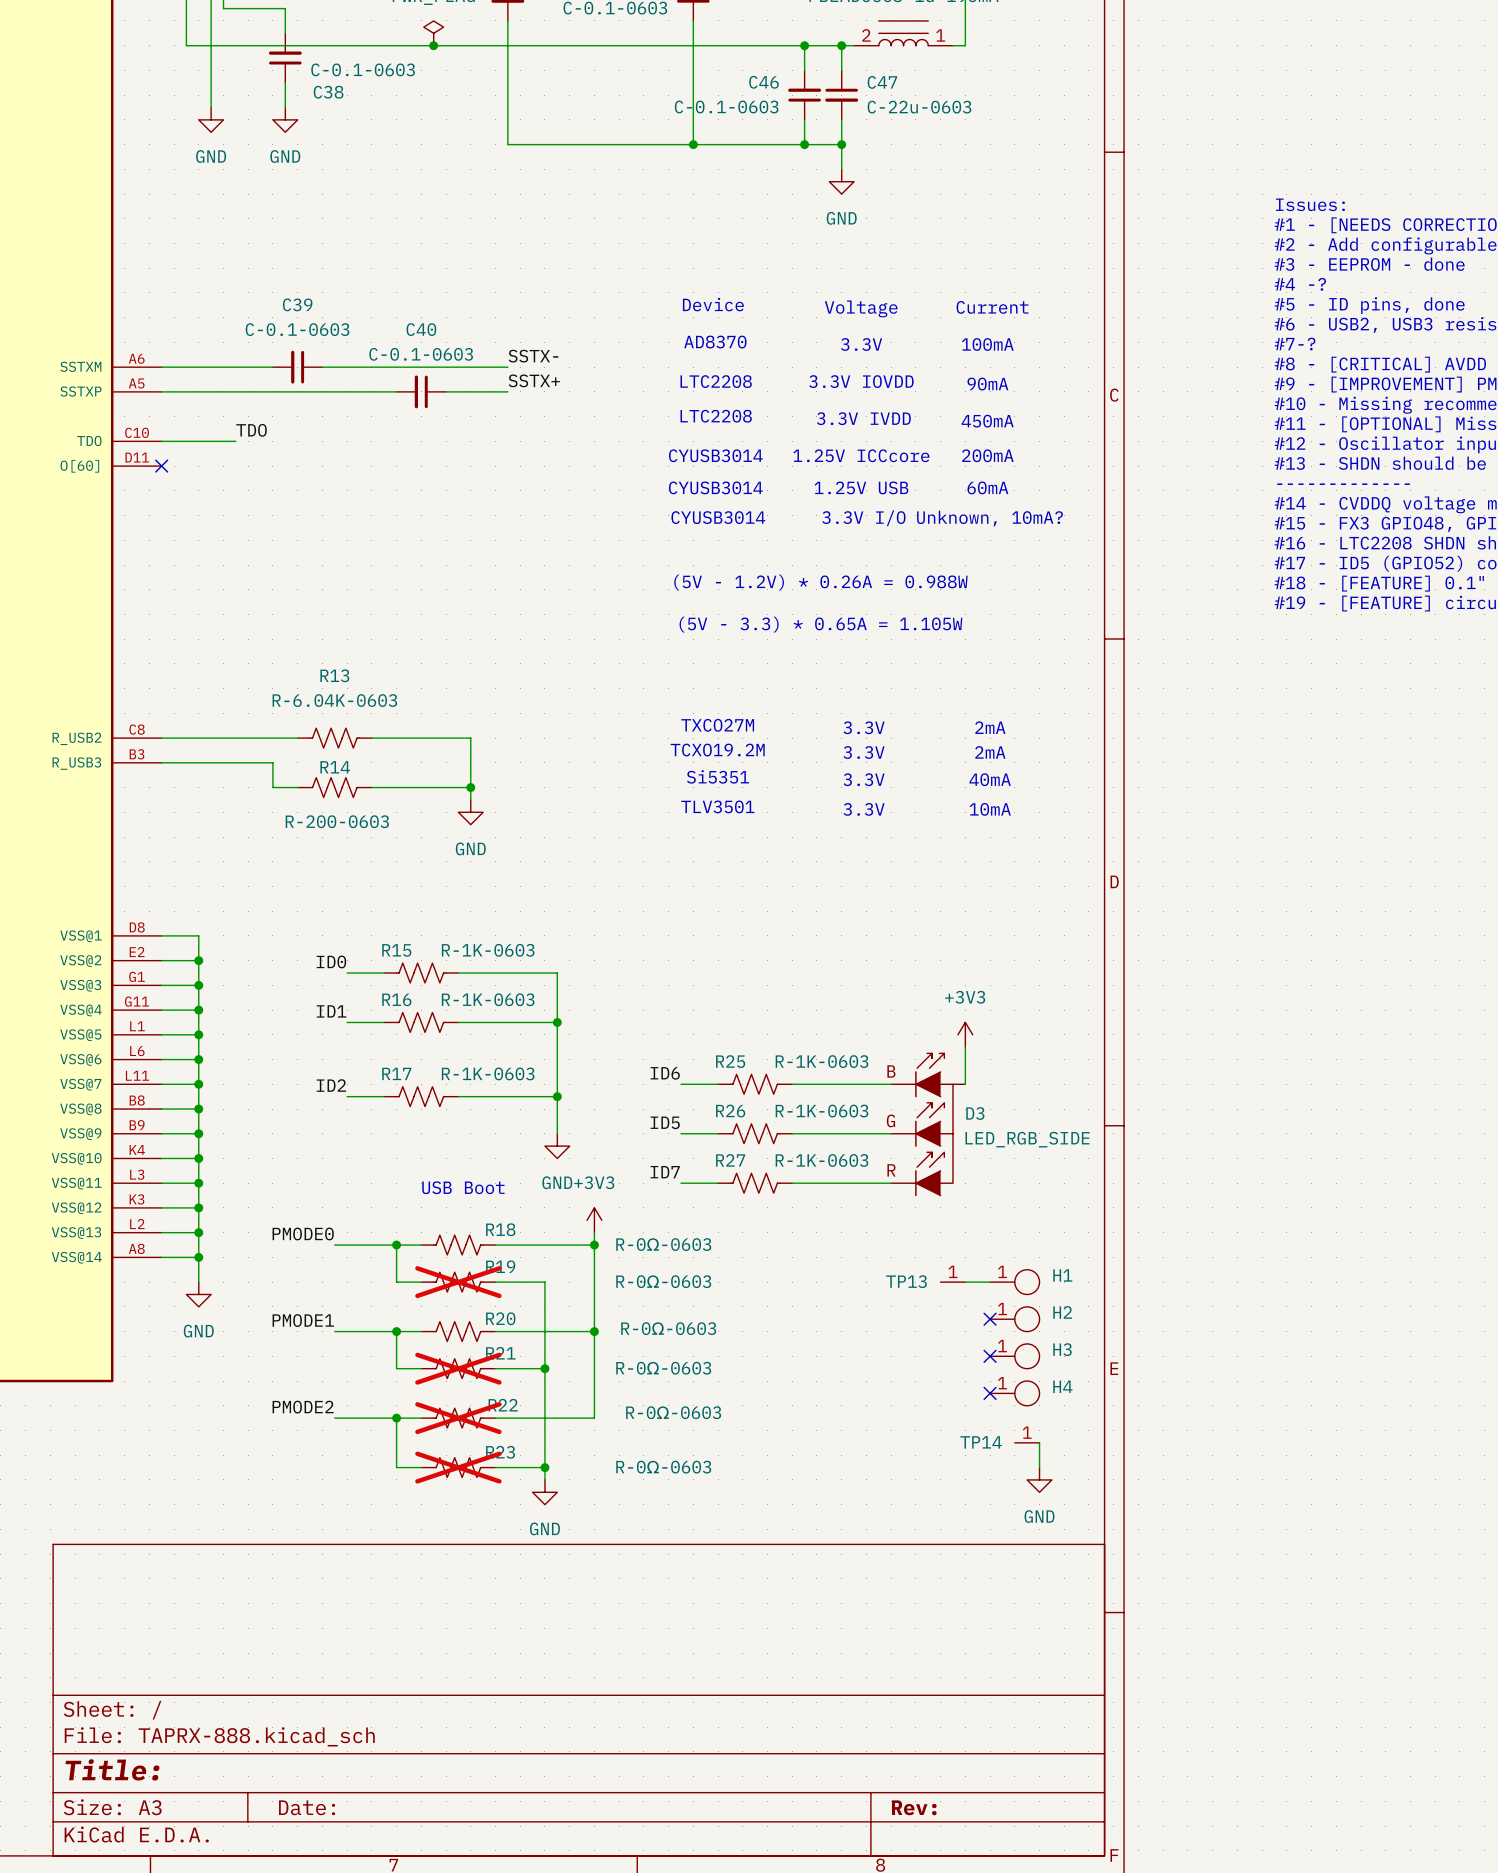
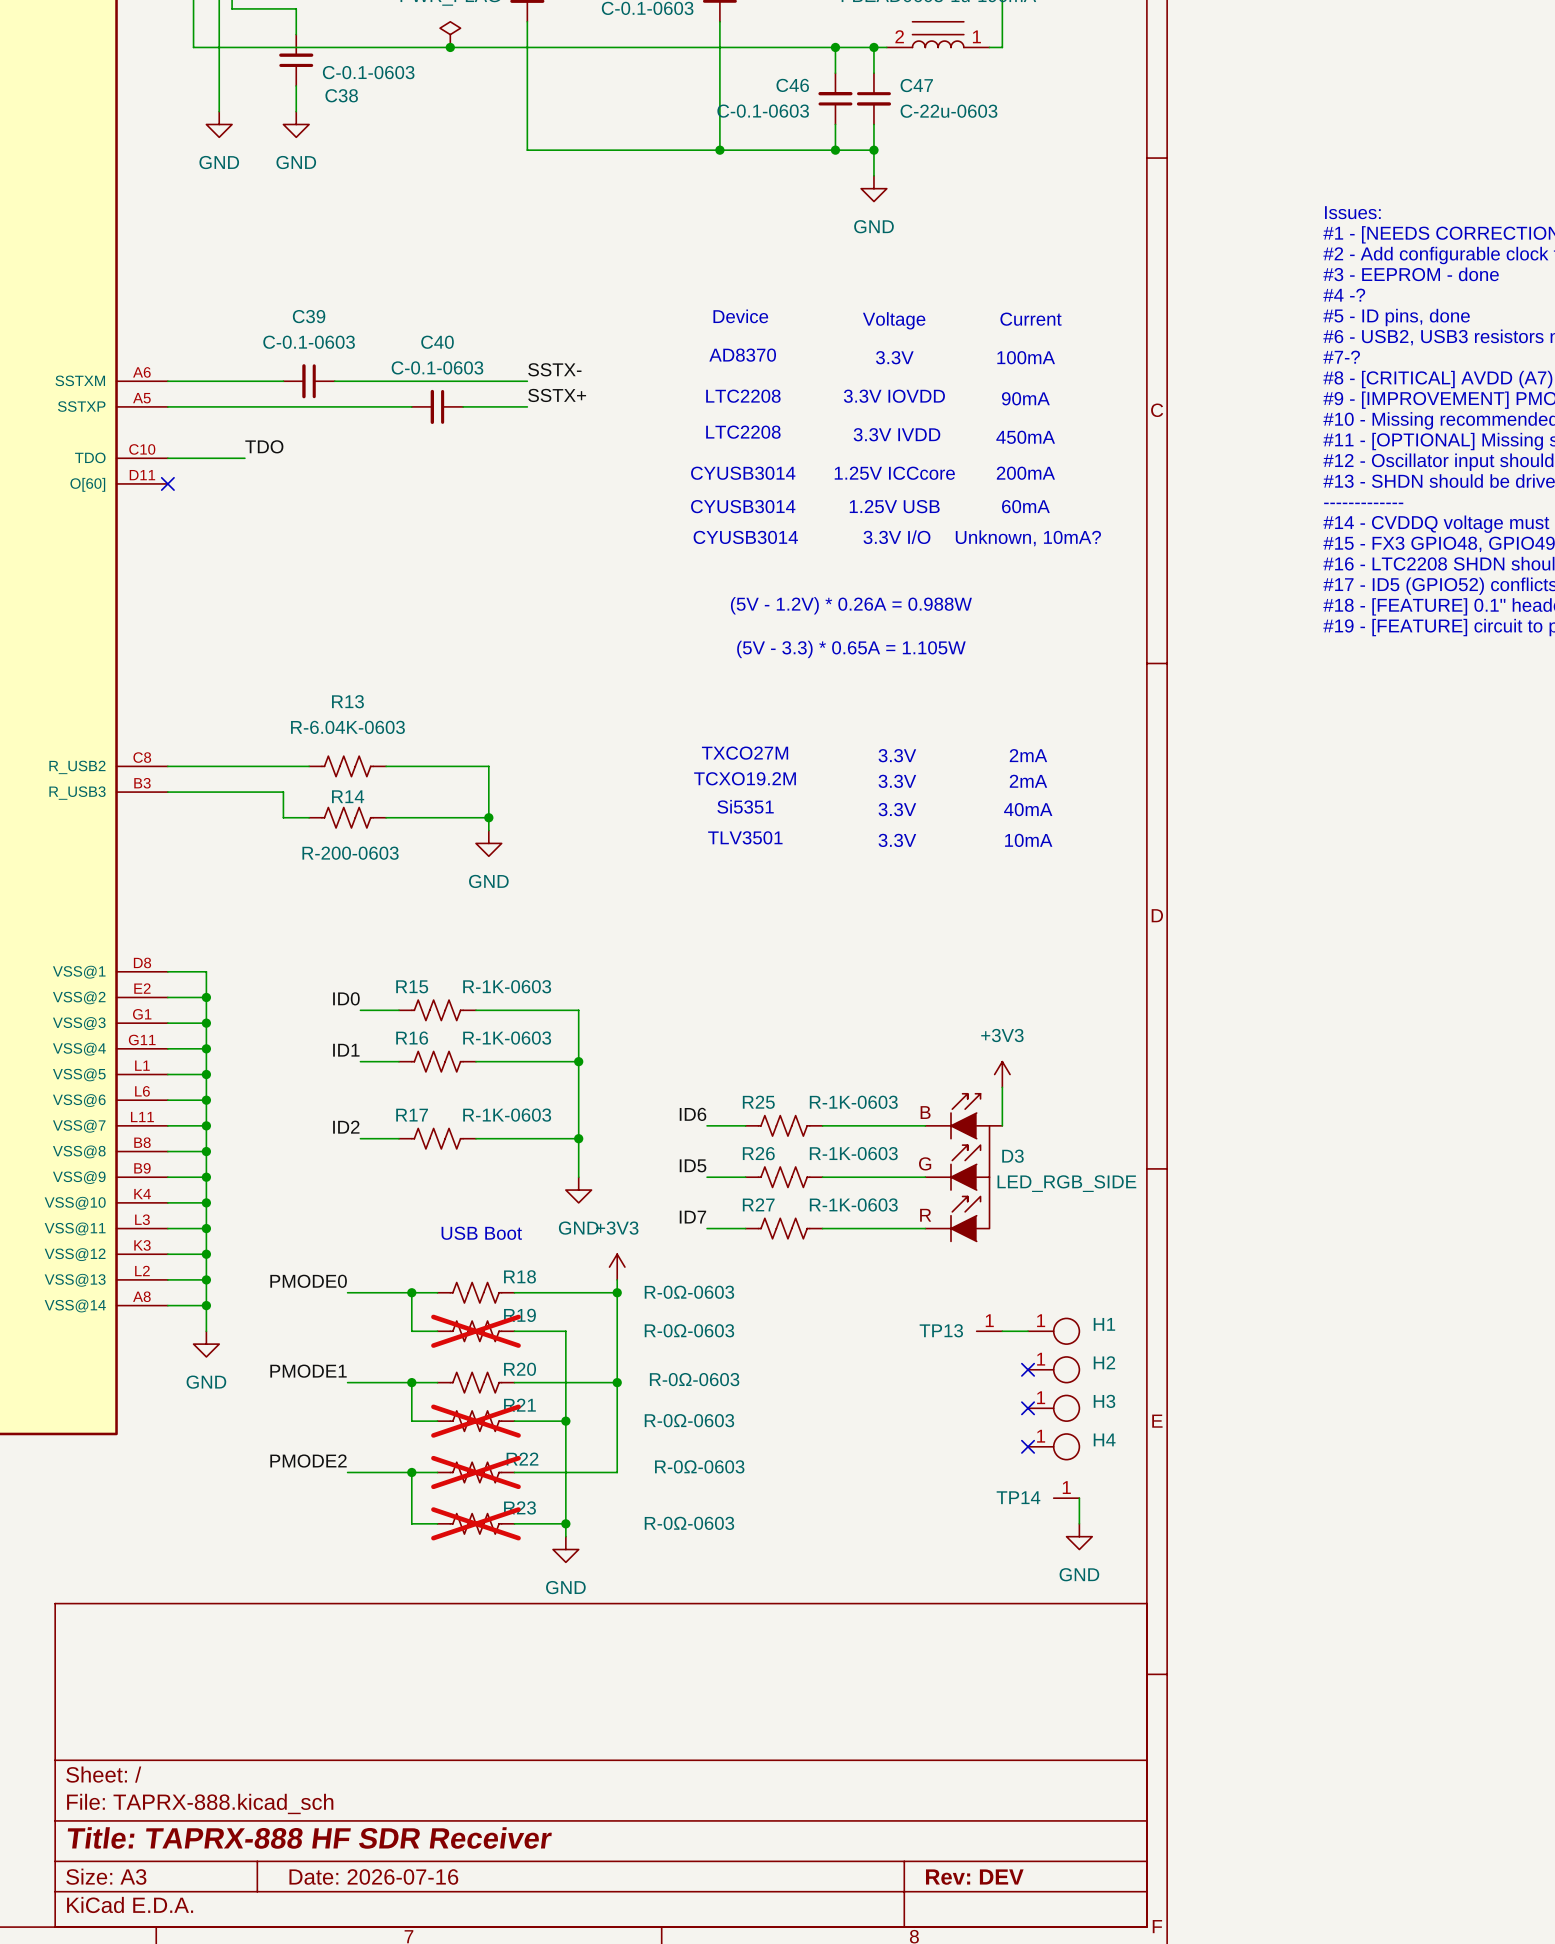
title block: Title: (112, 1769) -> Title: TAPRX-888 HF SDR Receiver (309, 1837)
title block: Date: (307, 1807) -> Date: 2026-07-16 (373, 1876)
title block: Rev: (914, 1807) -> Rev: DEV (974, 1877)

